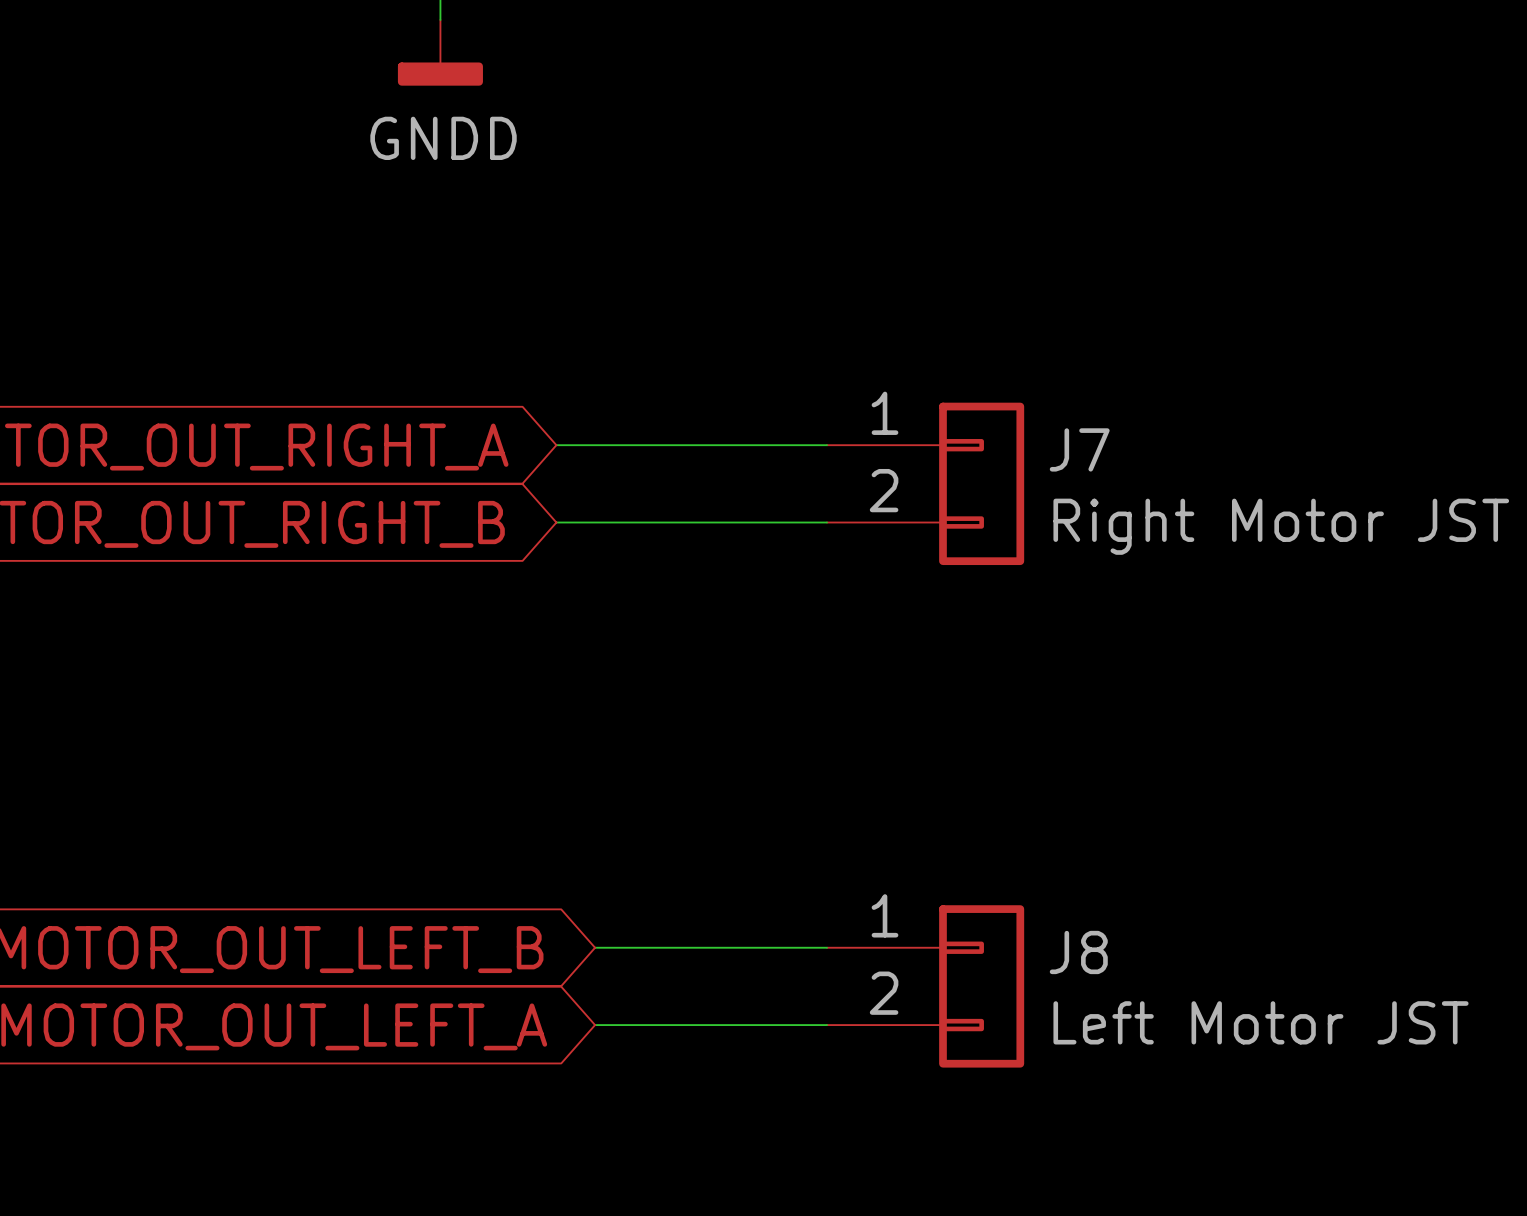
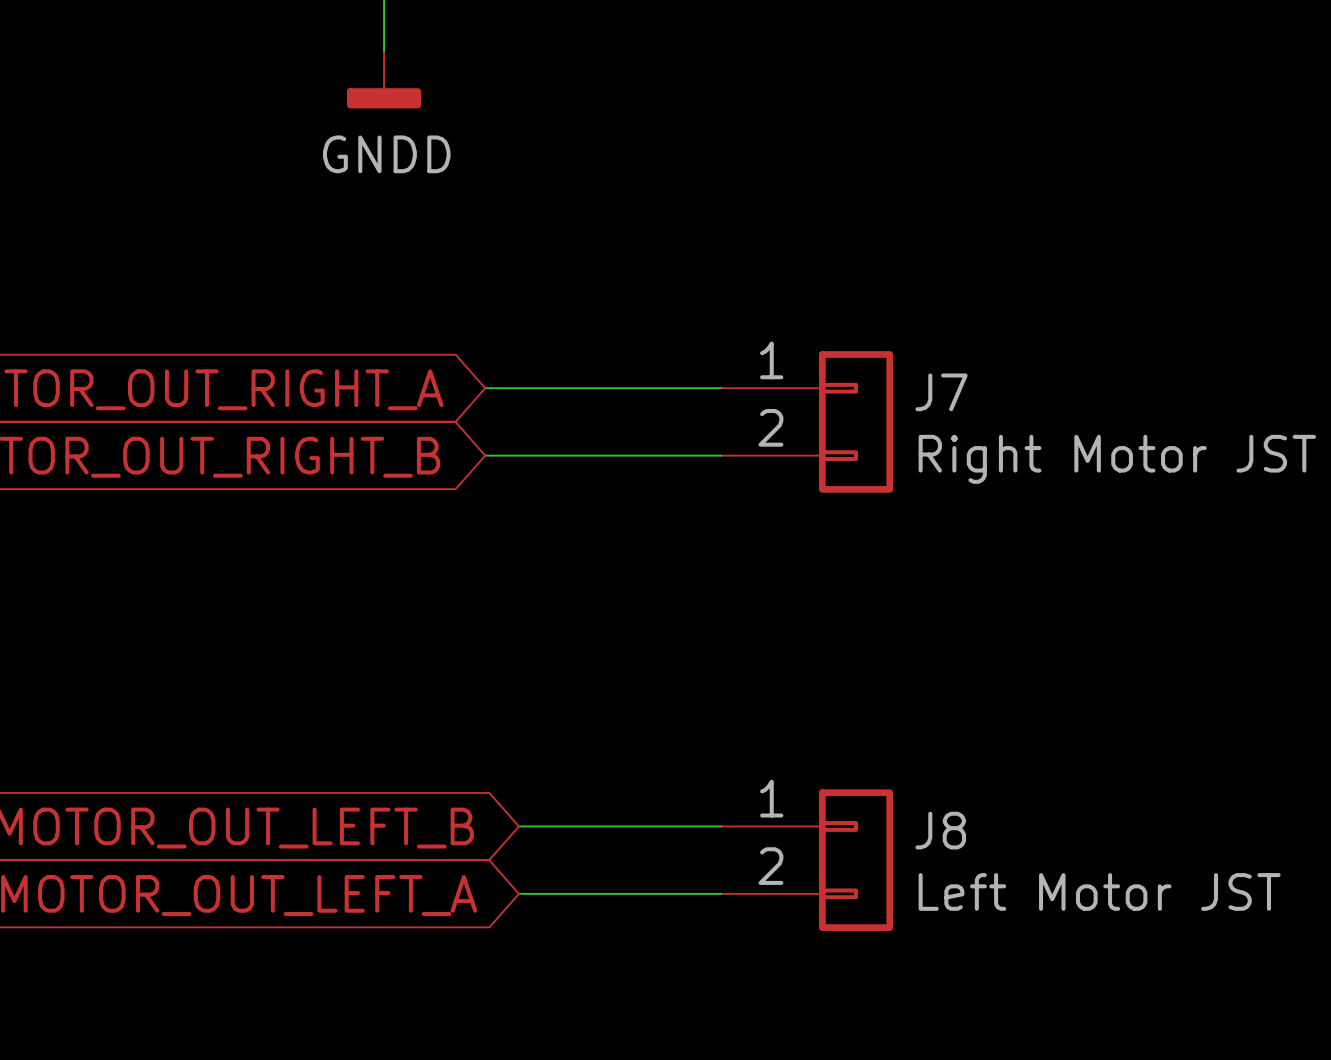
power symbol position: GNDD (440, 52) -> GNDD (384, 79)

